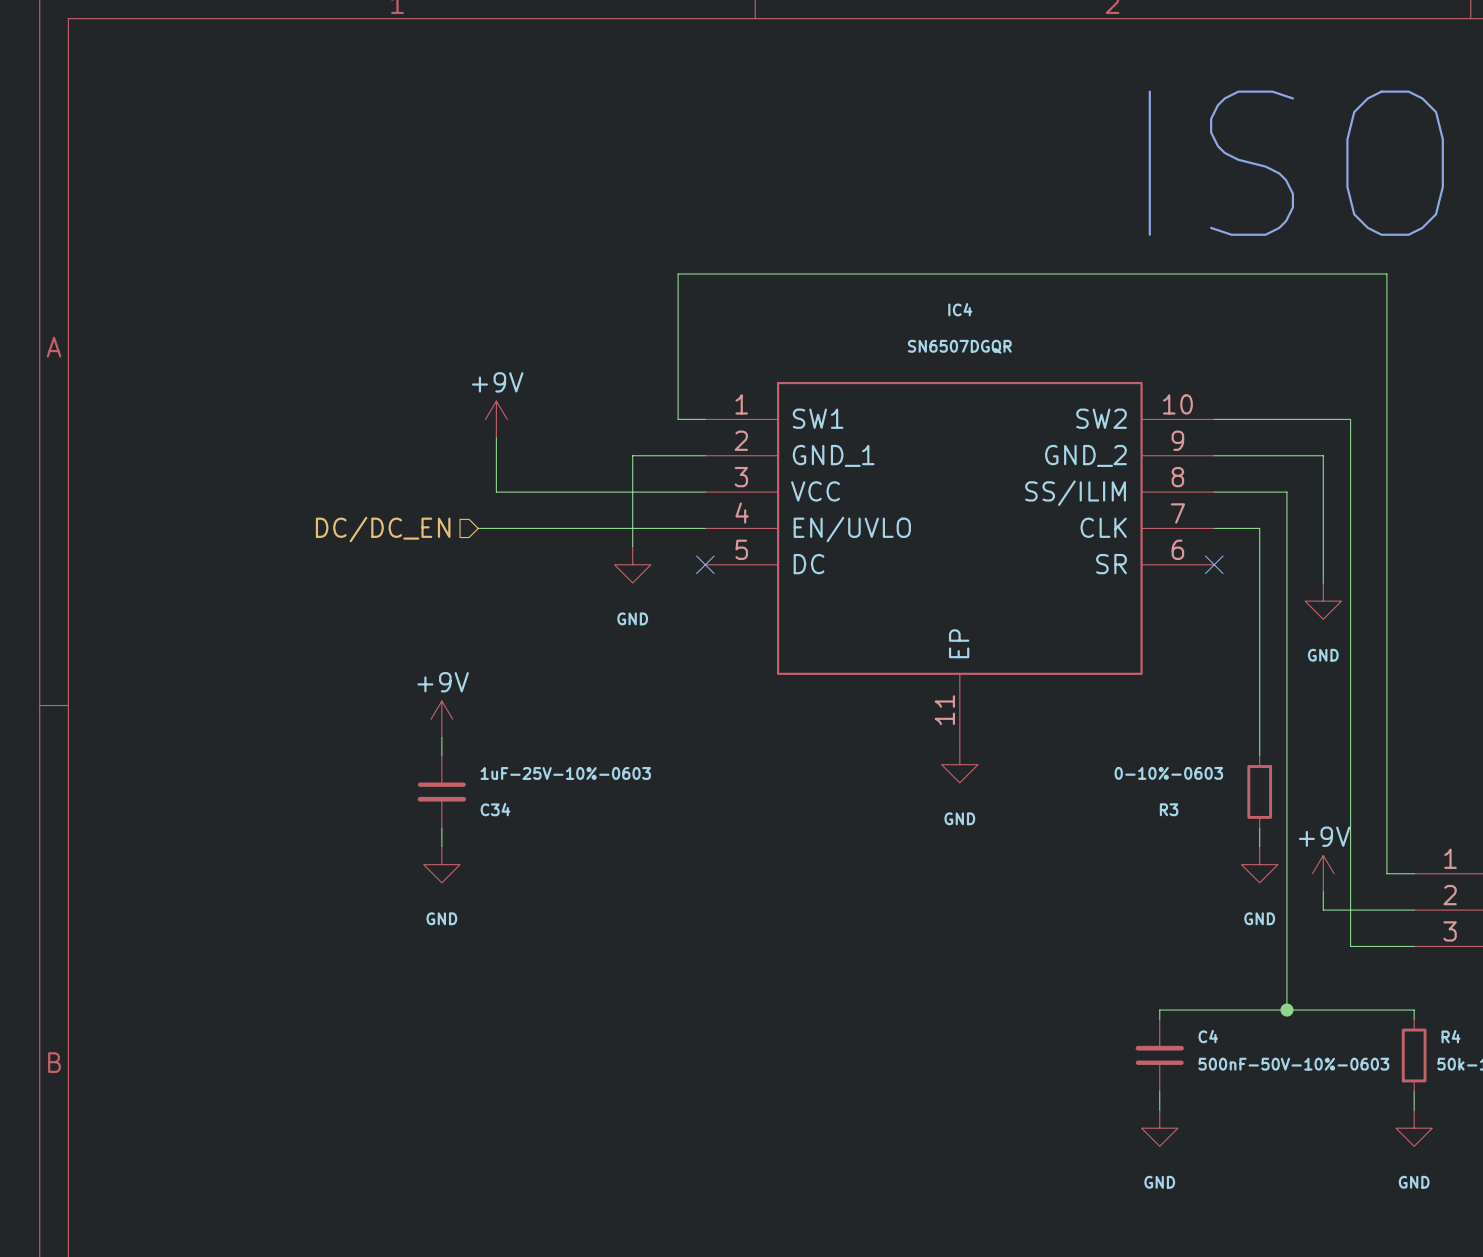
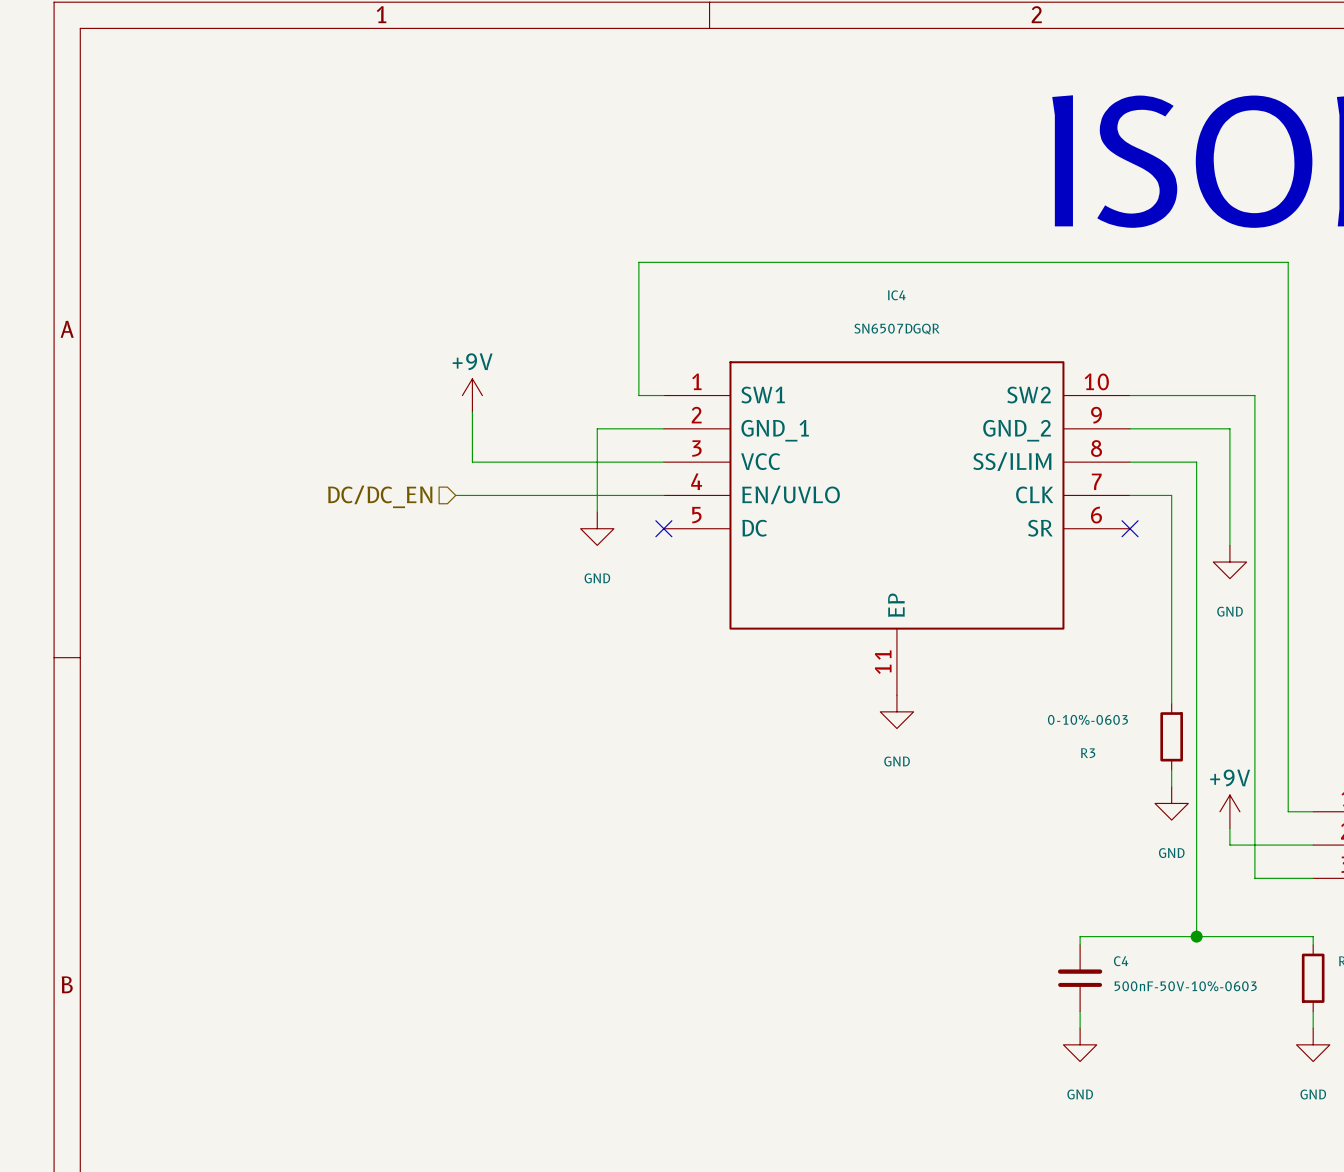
power symbol: +9V (441, 719) -> none
wire: (441, 737) (441, 755) -> none
C34: 1uF-25V-10%-0603 (441, 791) -> none
wire: (441, 828) (441, 846) -> none
power symbol: GND (441, 864) -> none

